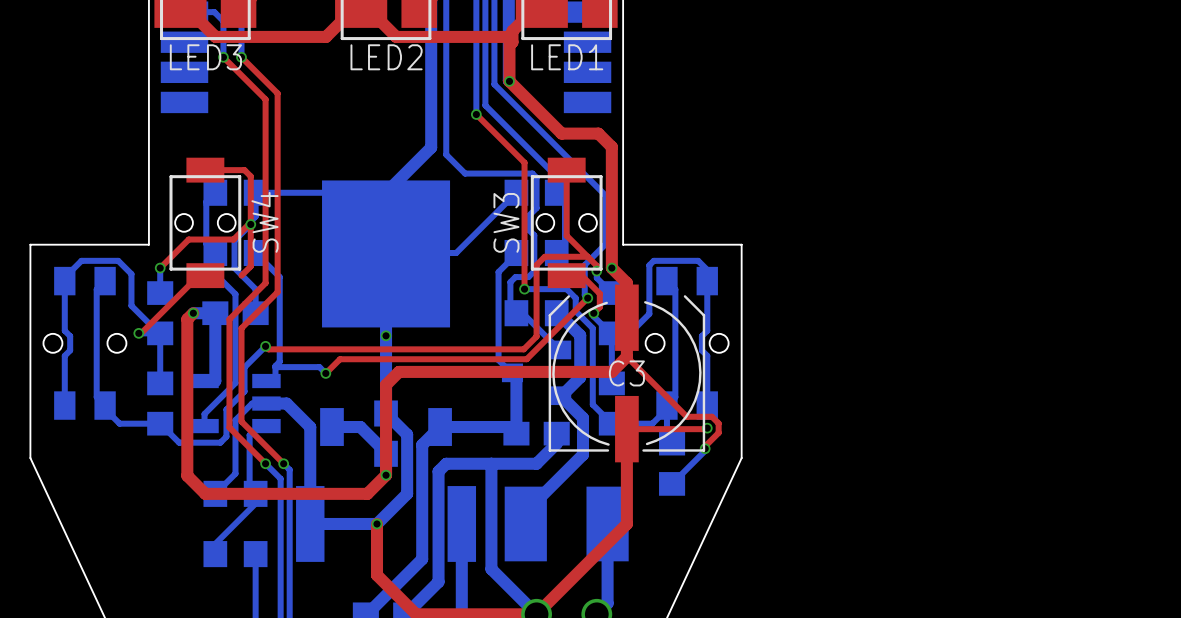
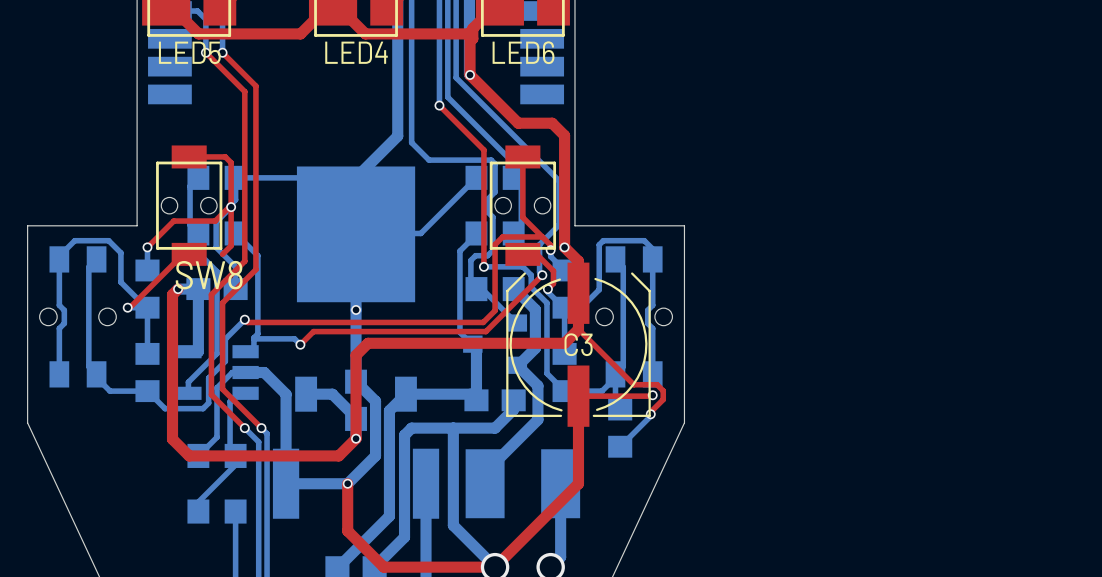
LED3 name: LED3 (205, 57) -> LED5 (189, 52)
LED2 name: LED2 (386, 57) -> LED4 (356, 52)
LED1 name: LED1 (567, 57) -> LED6 (523, 52)
SW4 name: SW4 (265, 222) -> SW8 (209, 275)
SW3 name: SW3 (506, 222) -> none

